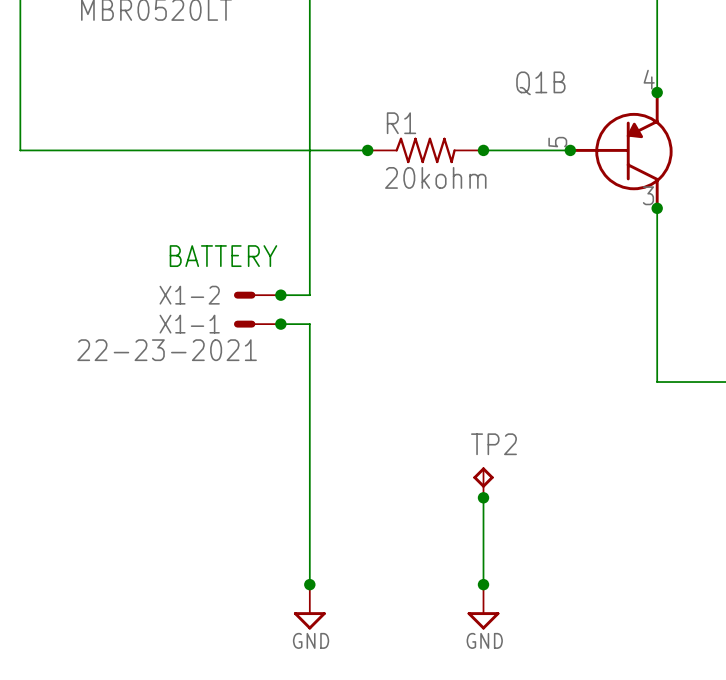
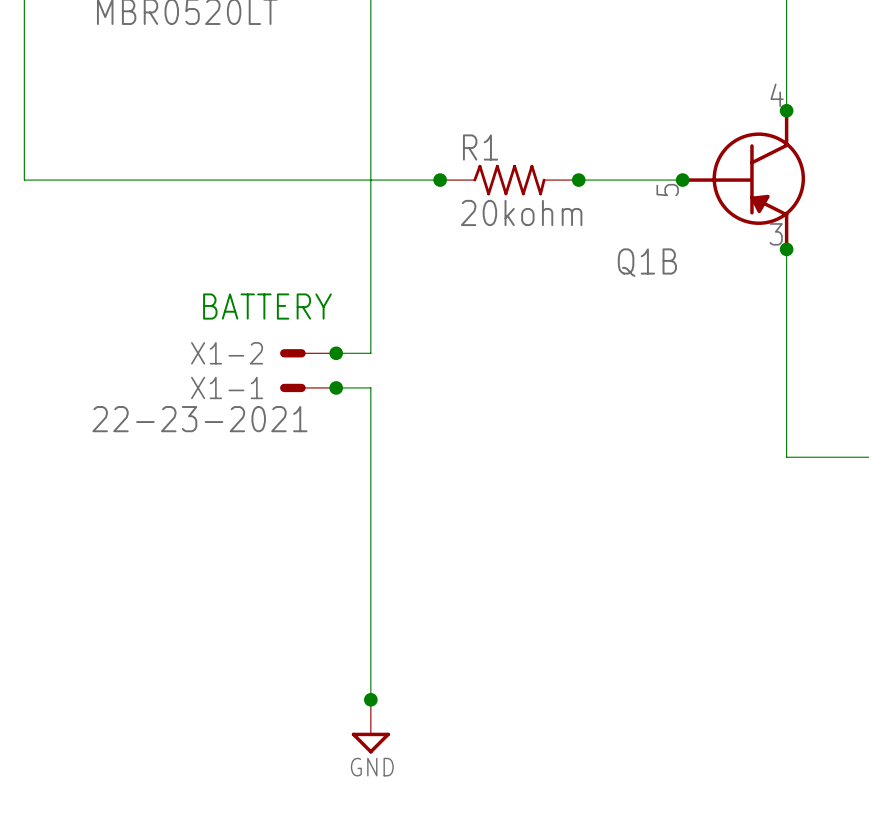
Q1B name position: Q1B (540, 83) -> Q1B (647, 262)
Q1B symbol: [570, 91, 673, 210] -> [683, 109, 806, 252]
TP2: (483, 482) -> none
wire: (483, 497) (483, 584) -> none
junction: (483, 497) -> none
junction: (483, 584) -> none
power symbol: GND (483, 607) -> none

